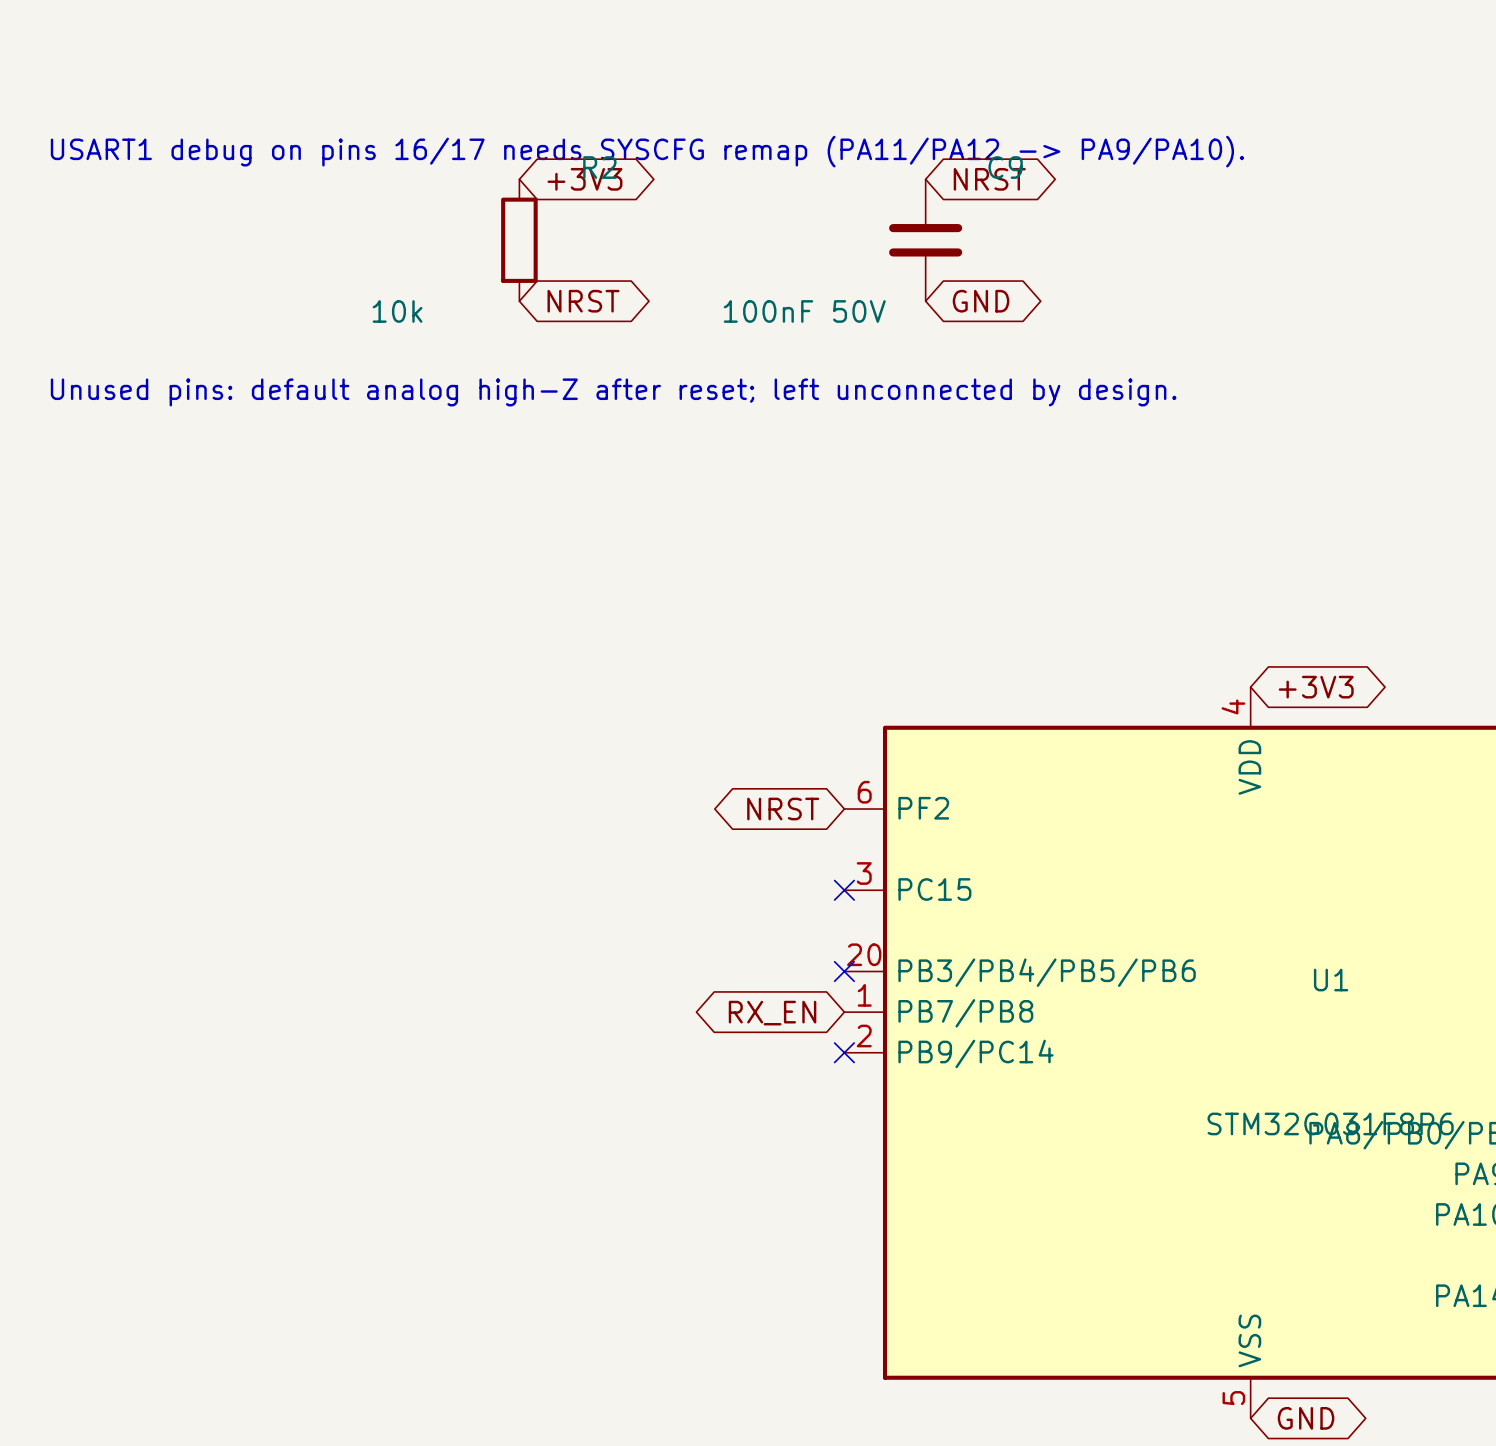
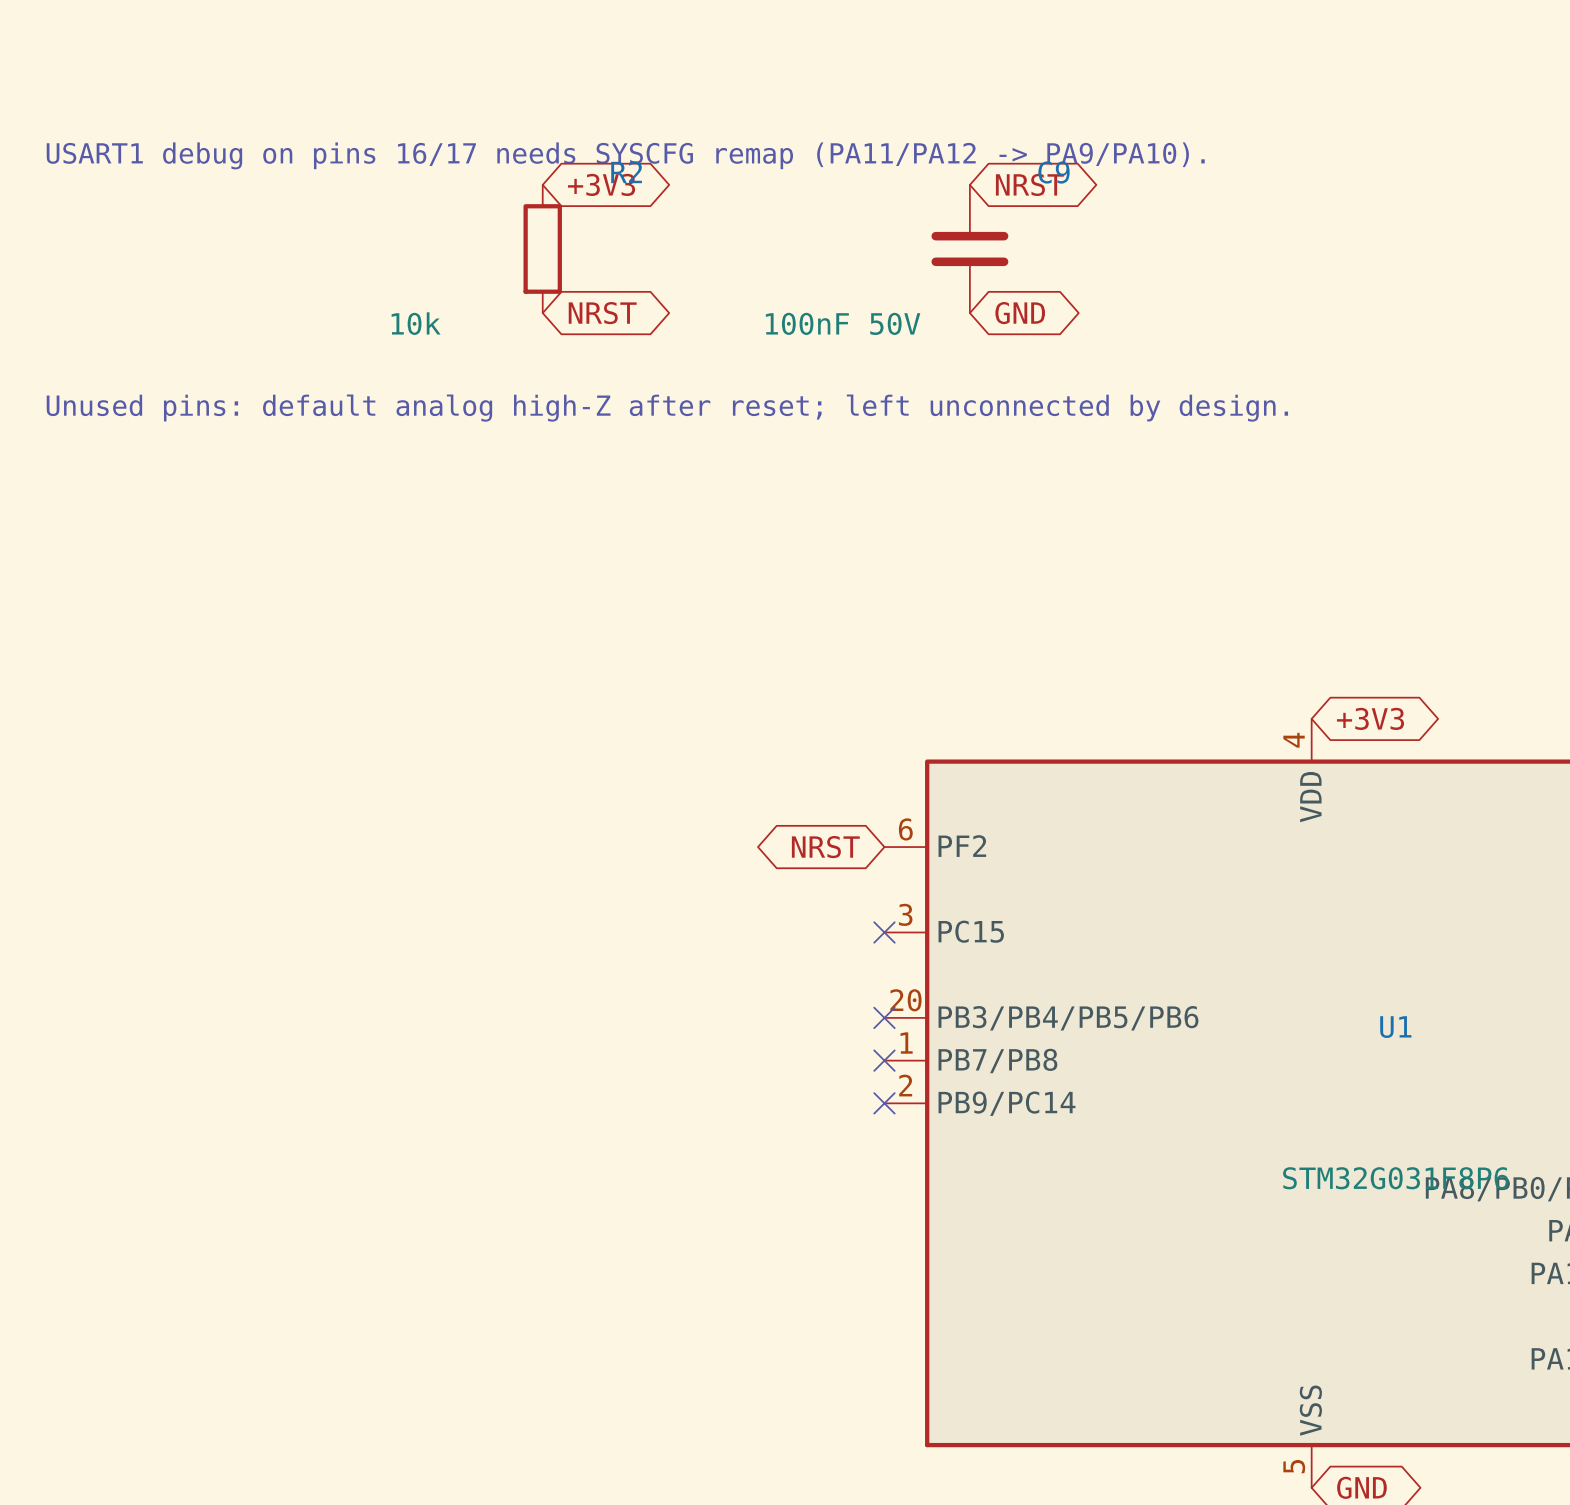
no-connect mark: none -> (884, 1060)
global label: RX_EN (772, 1013) -> none

